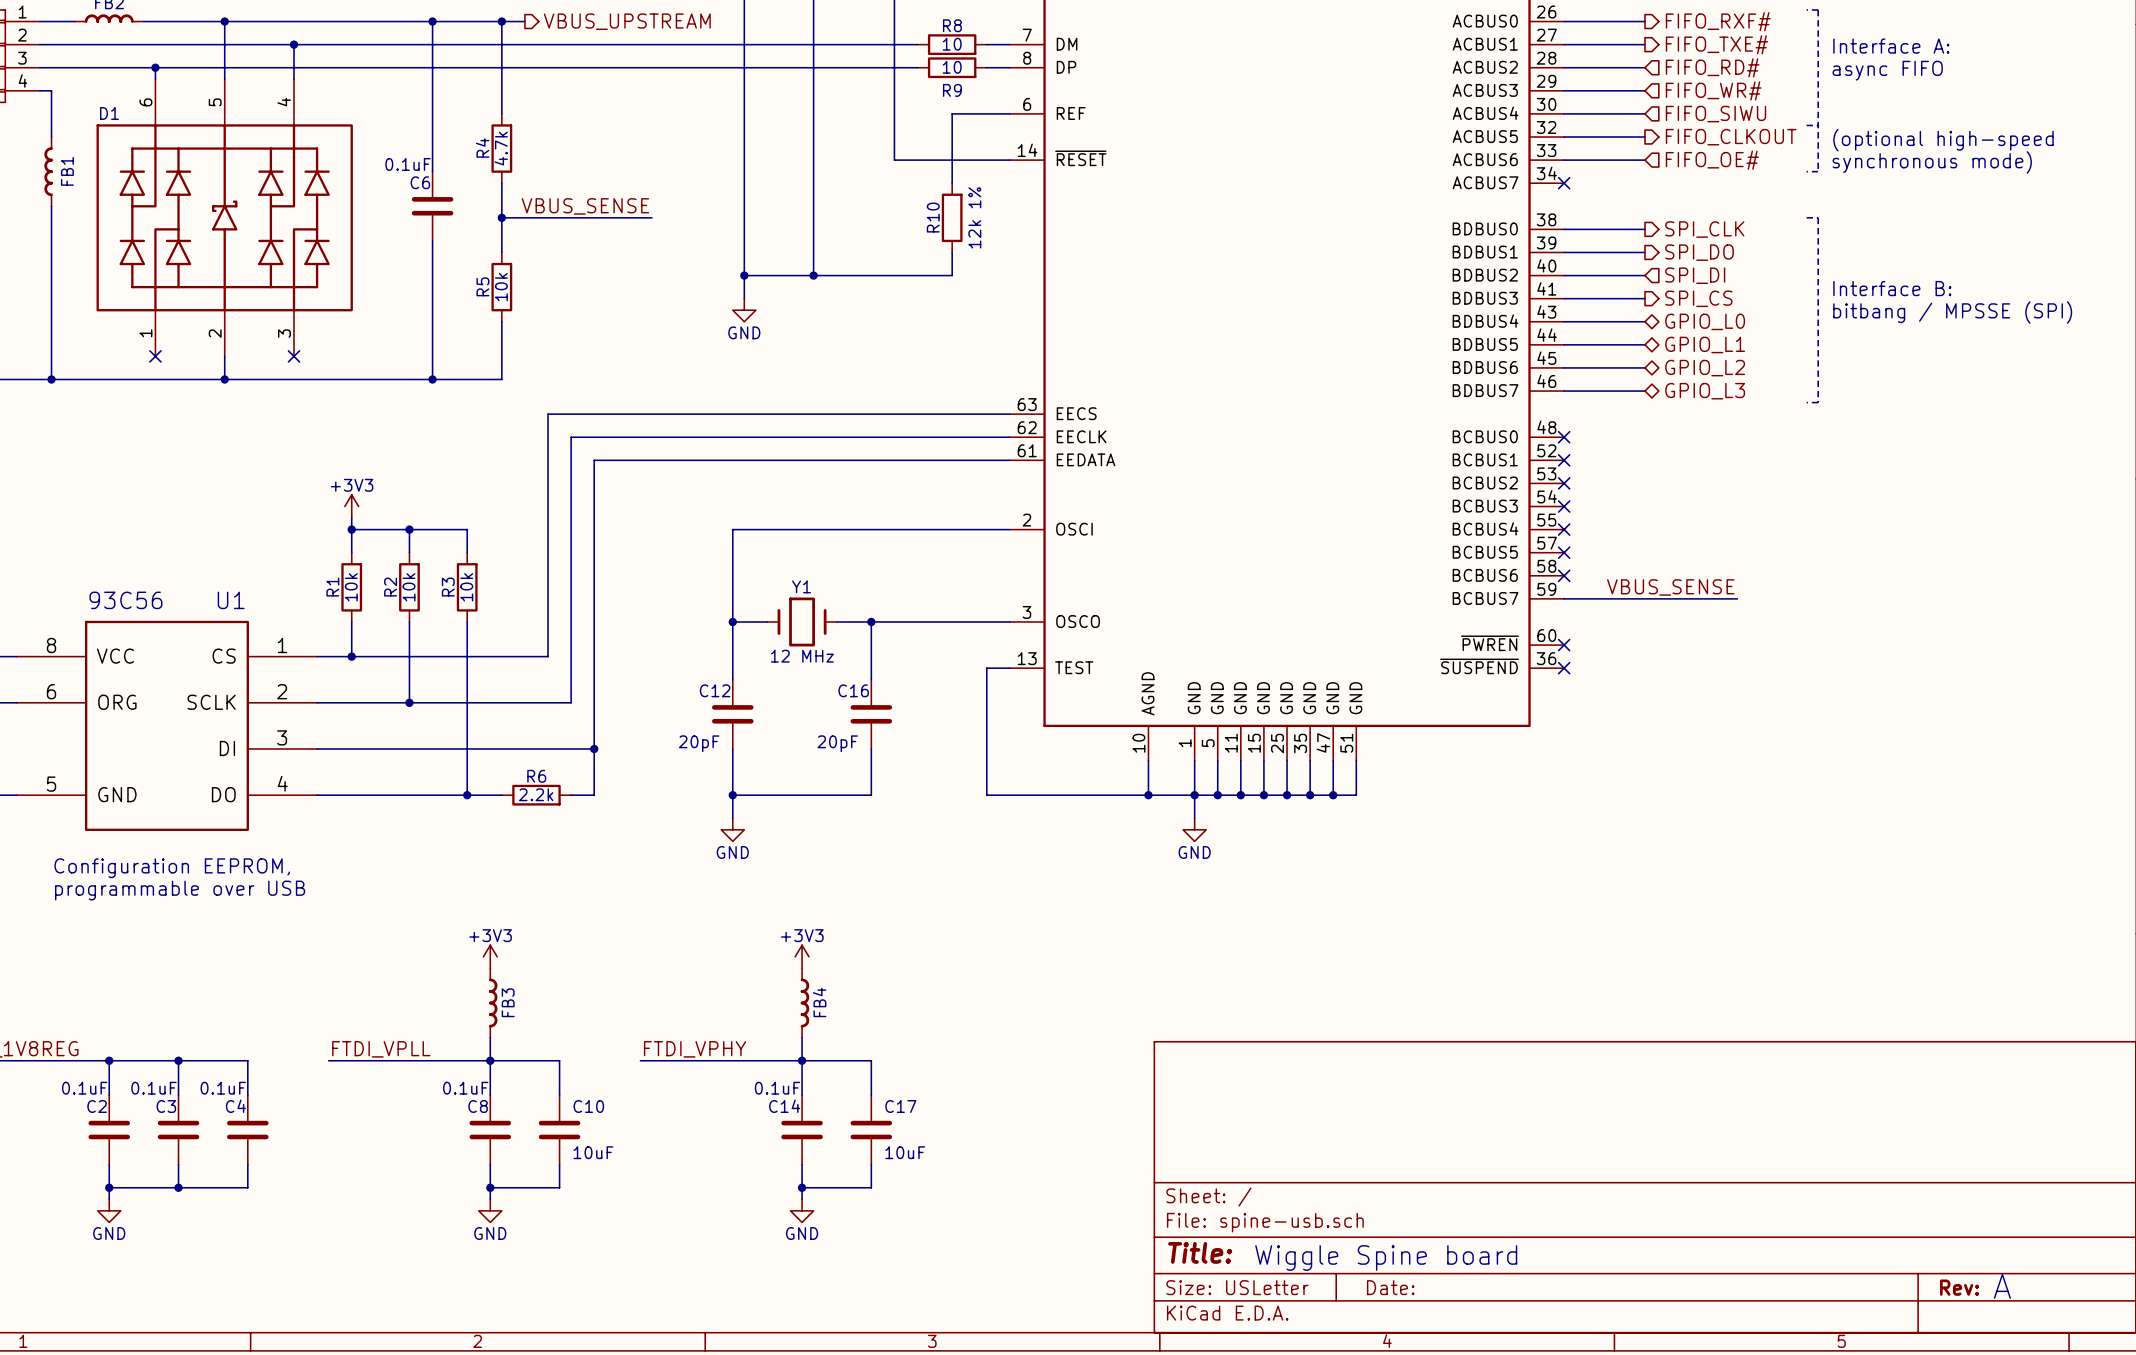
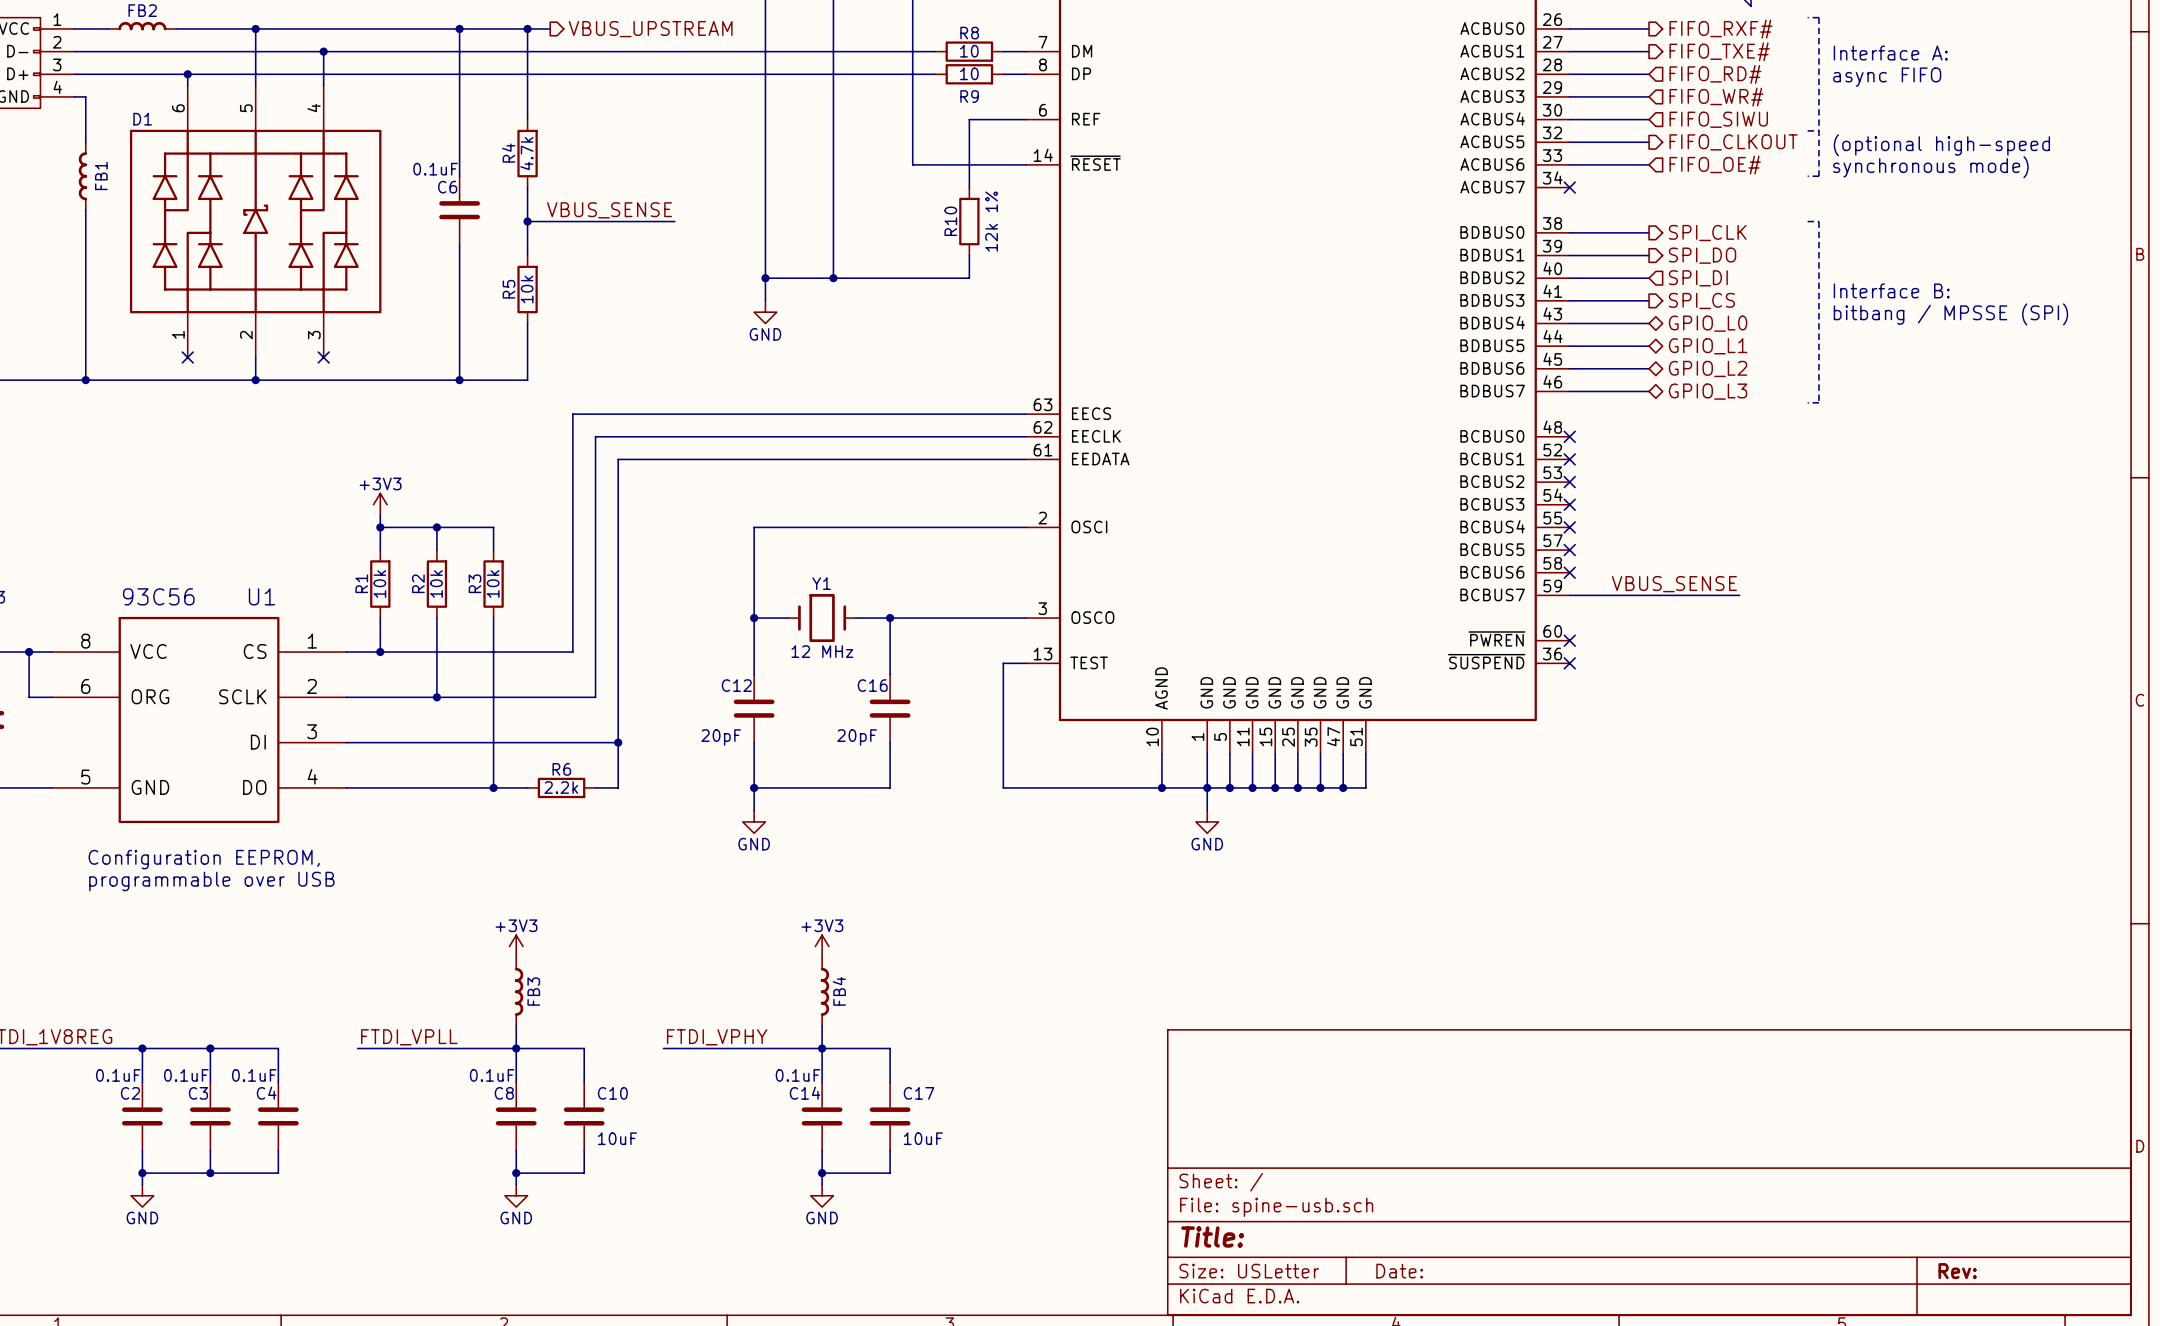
text: Wiggle Spine board (1386, 1258) -> none
text: A (2002, 1286) -> none

